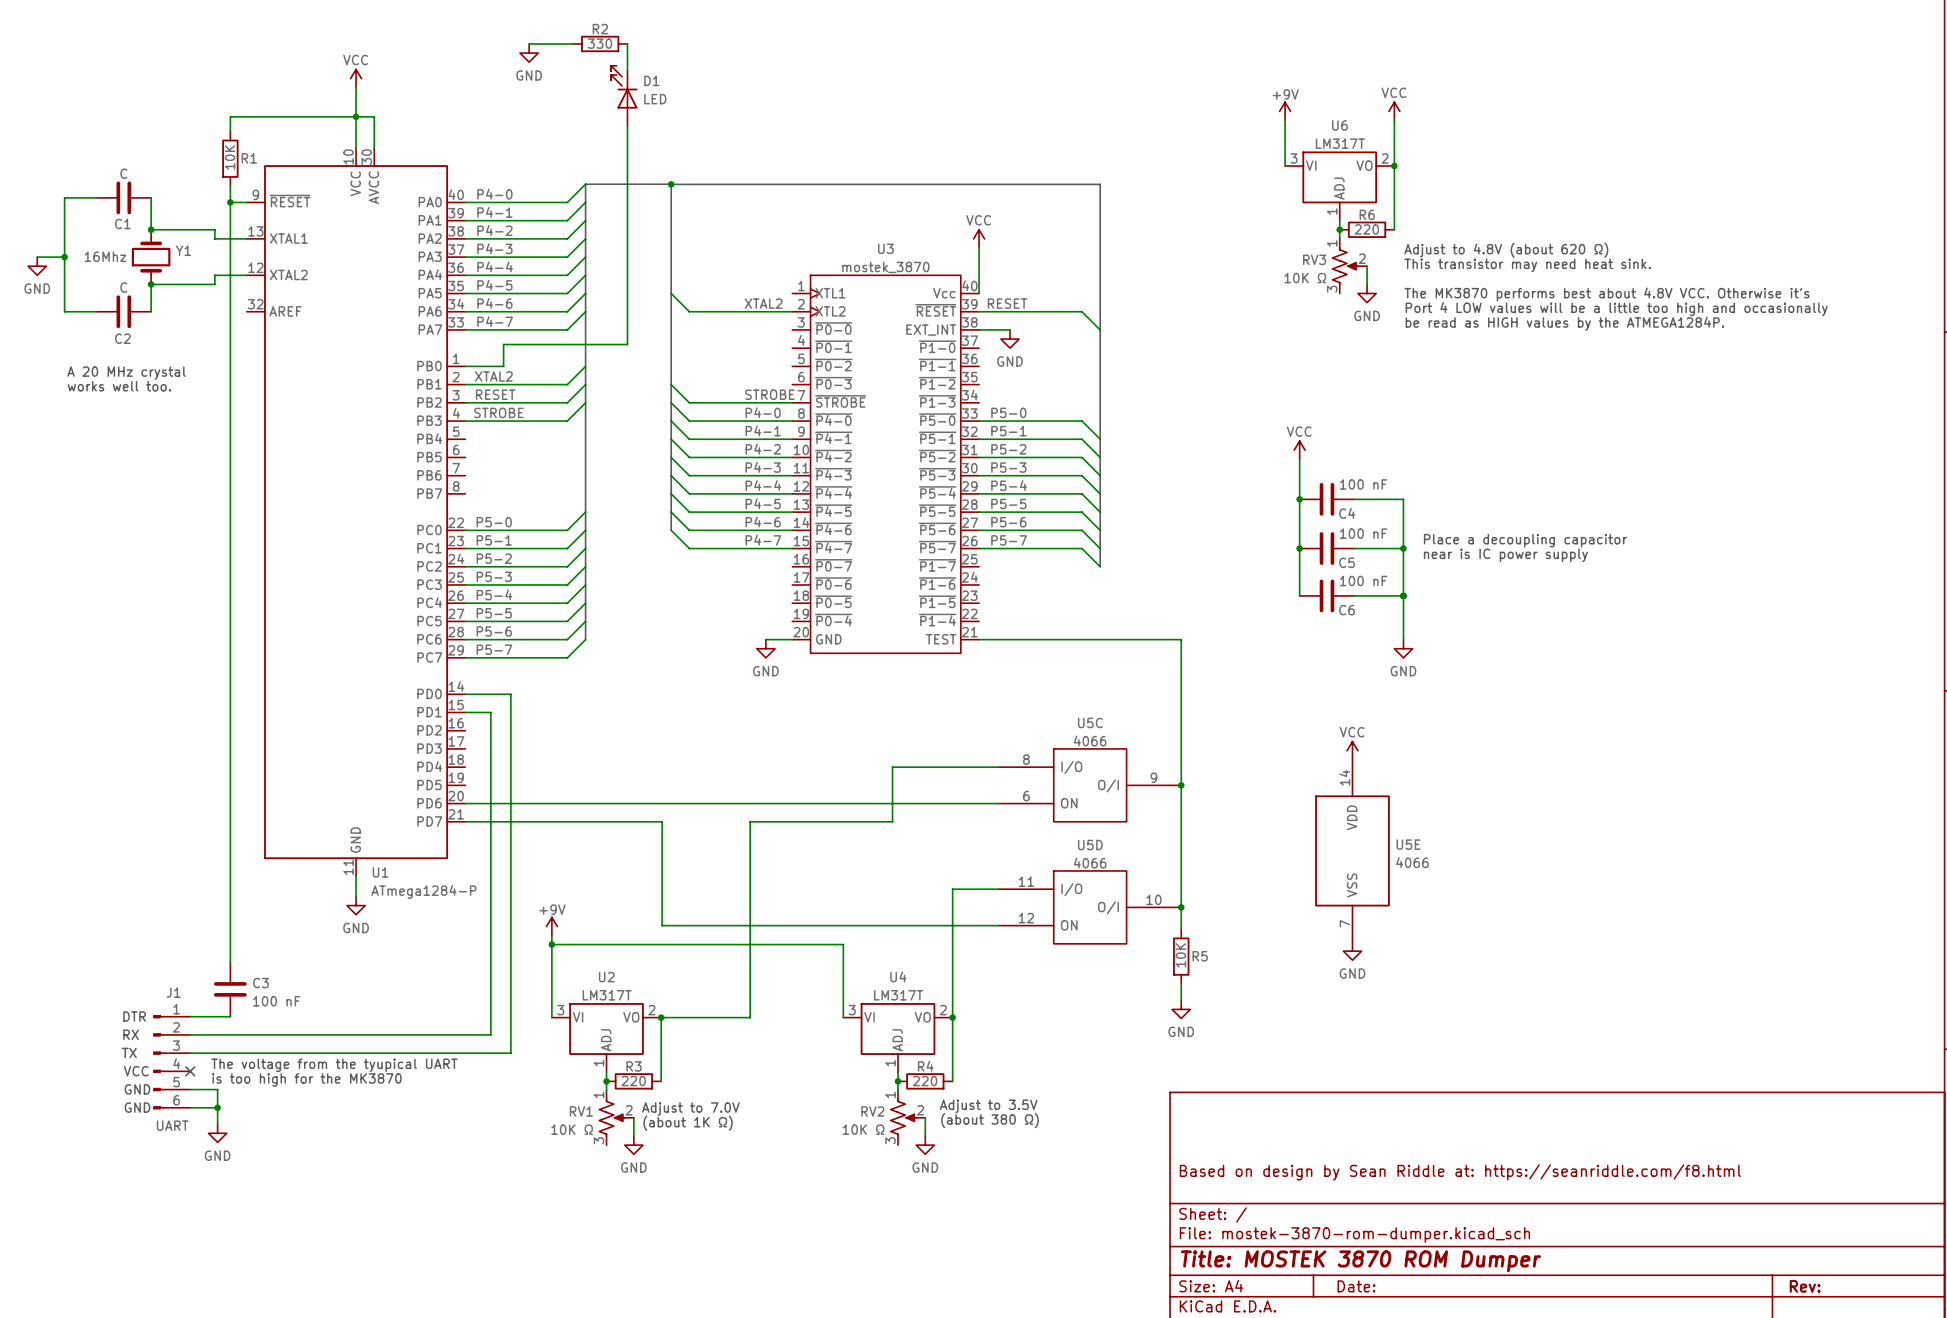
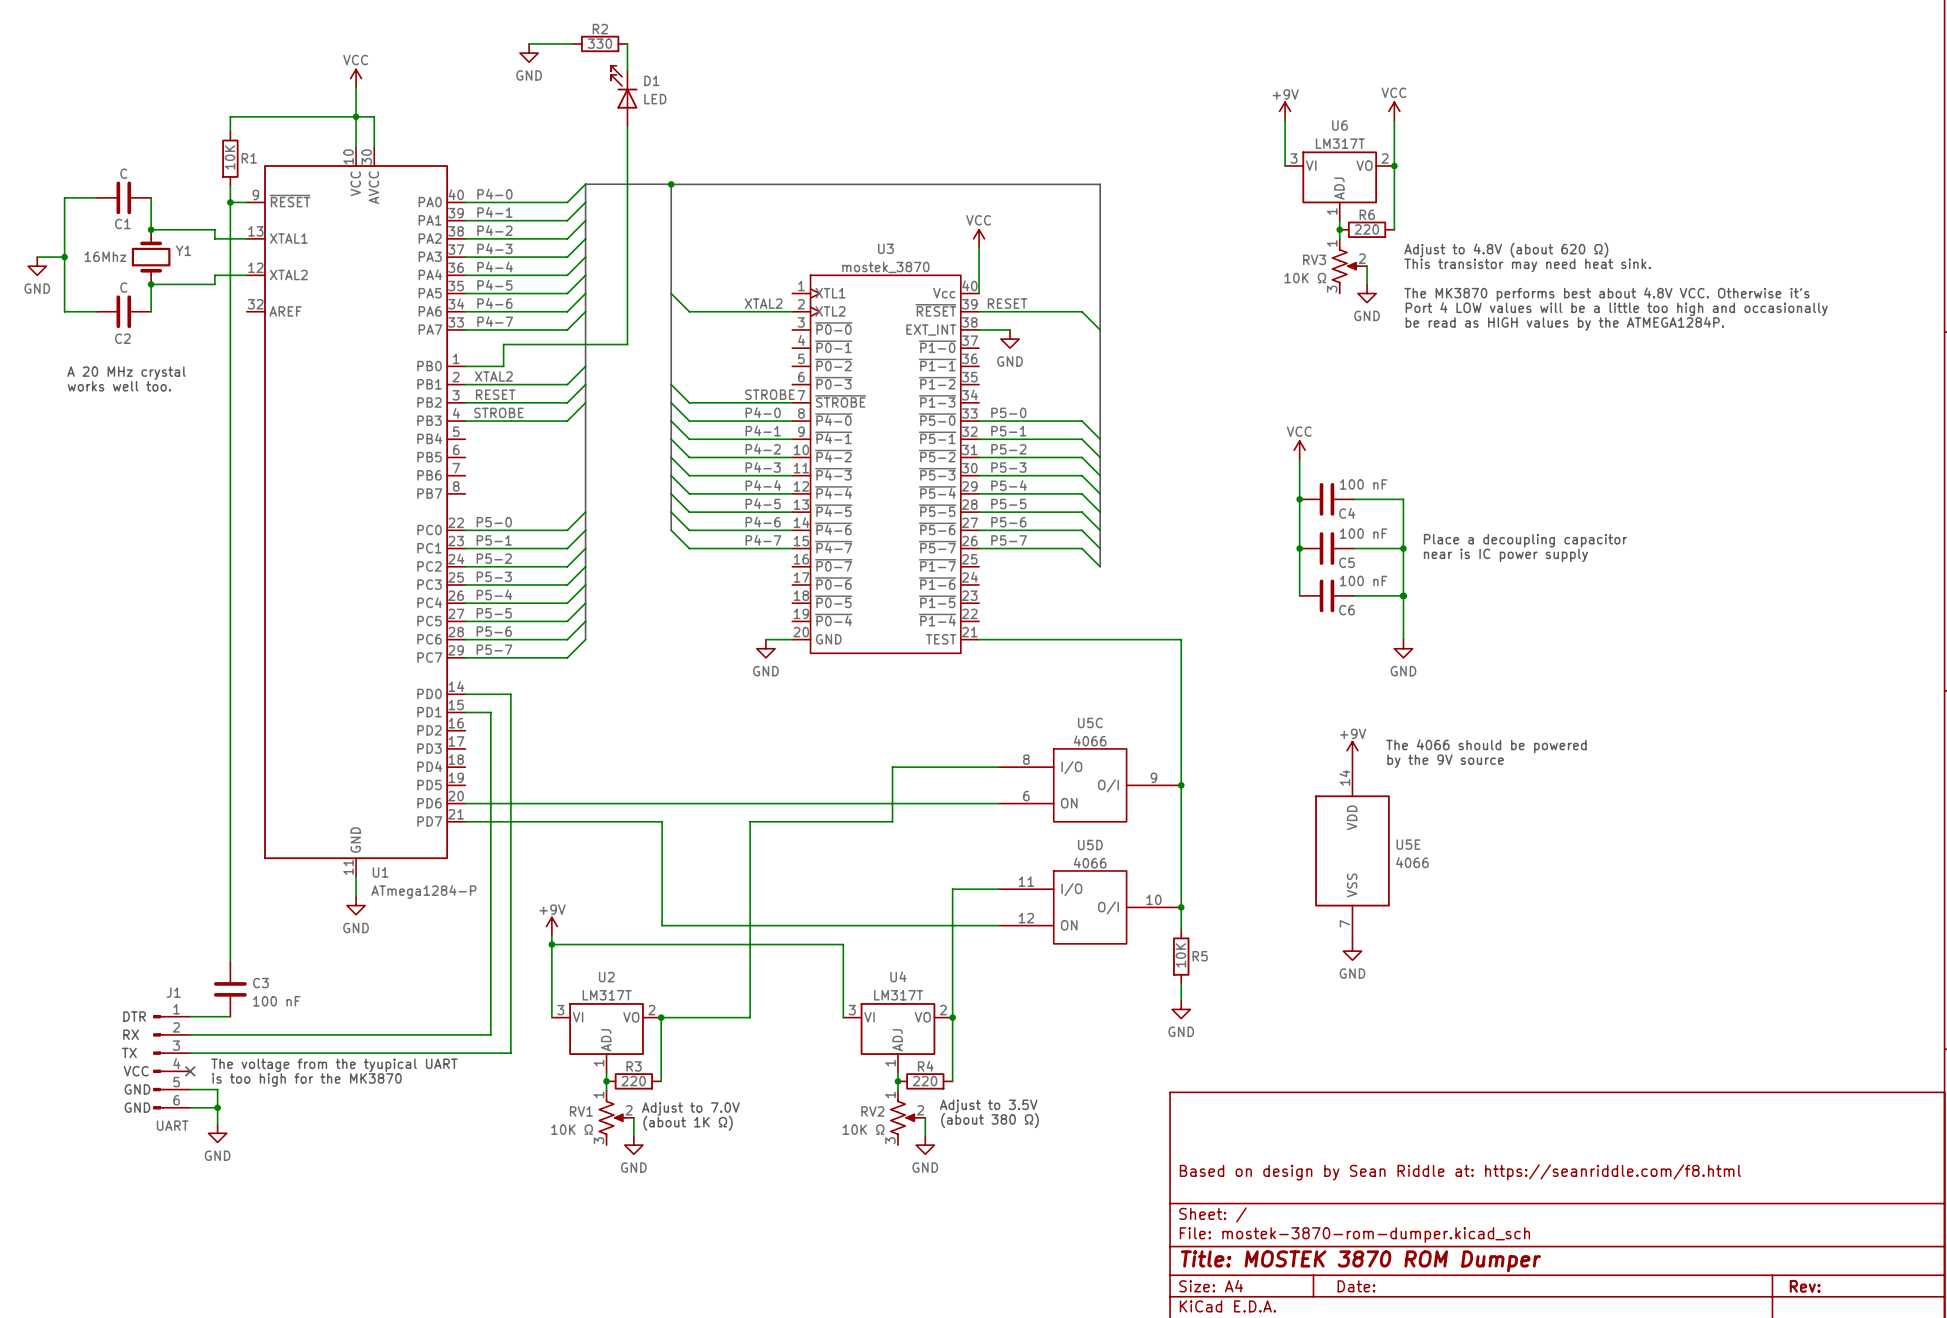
text: none -> The 4066 should be powered (1486, 746)
power symbol: VCC (1352, 750) -> +9V (1352, 750)
text: none -> by the 9V source (1445, 761)

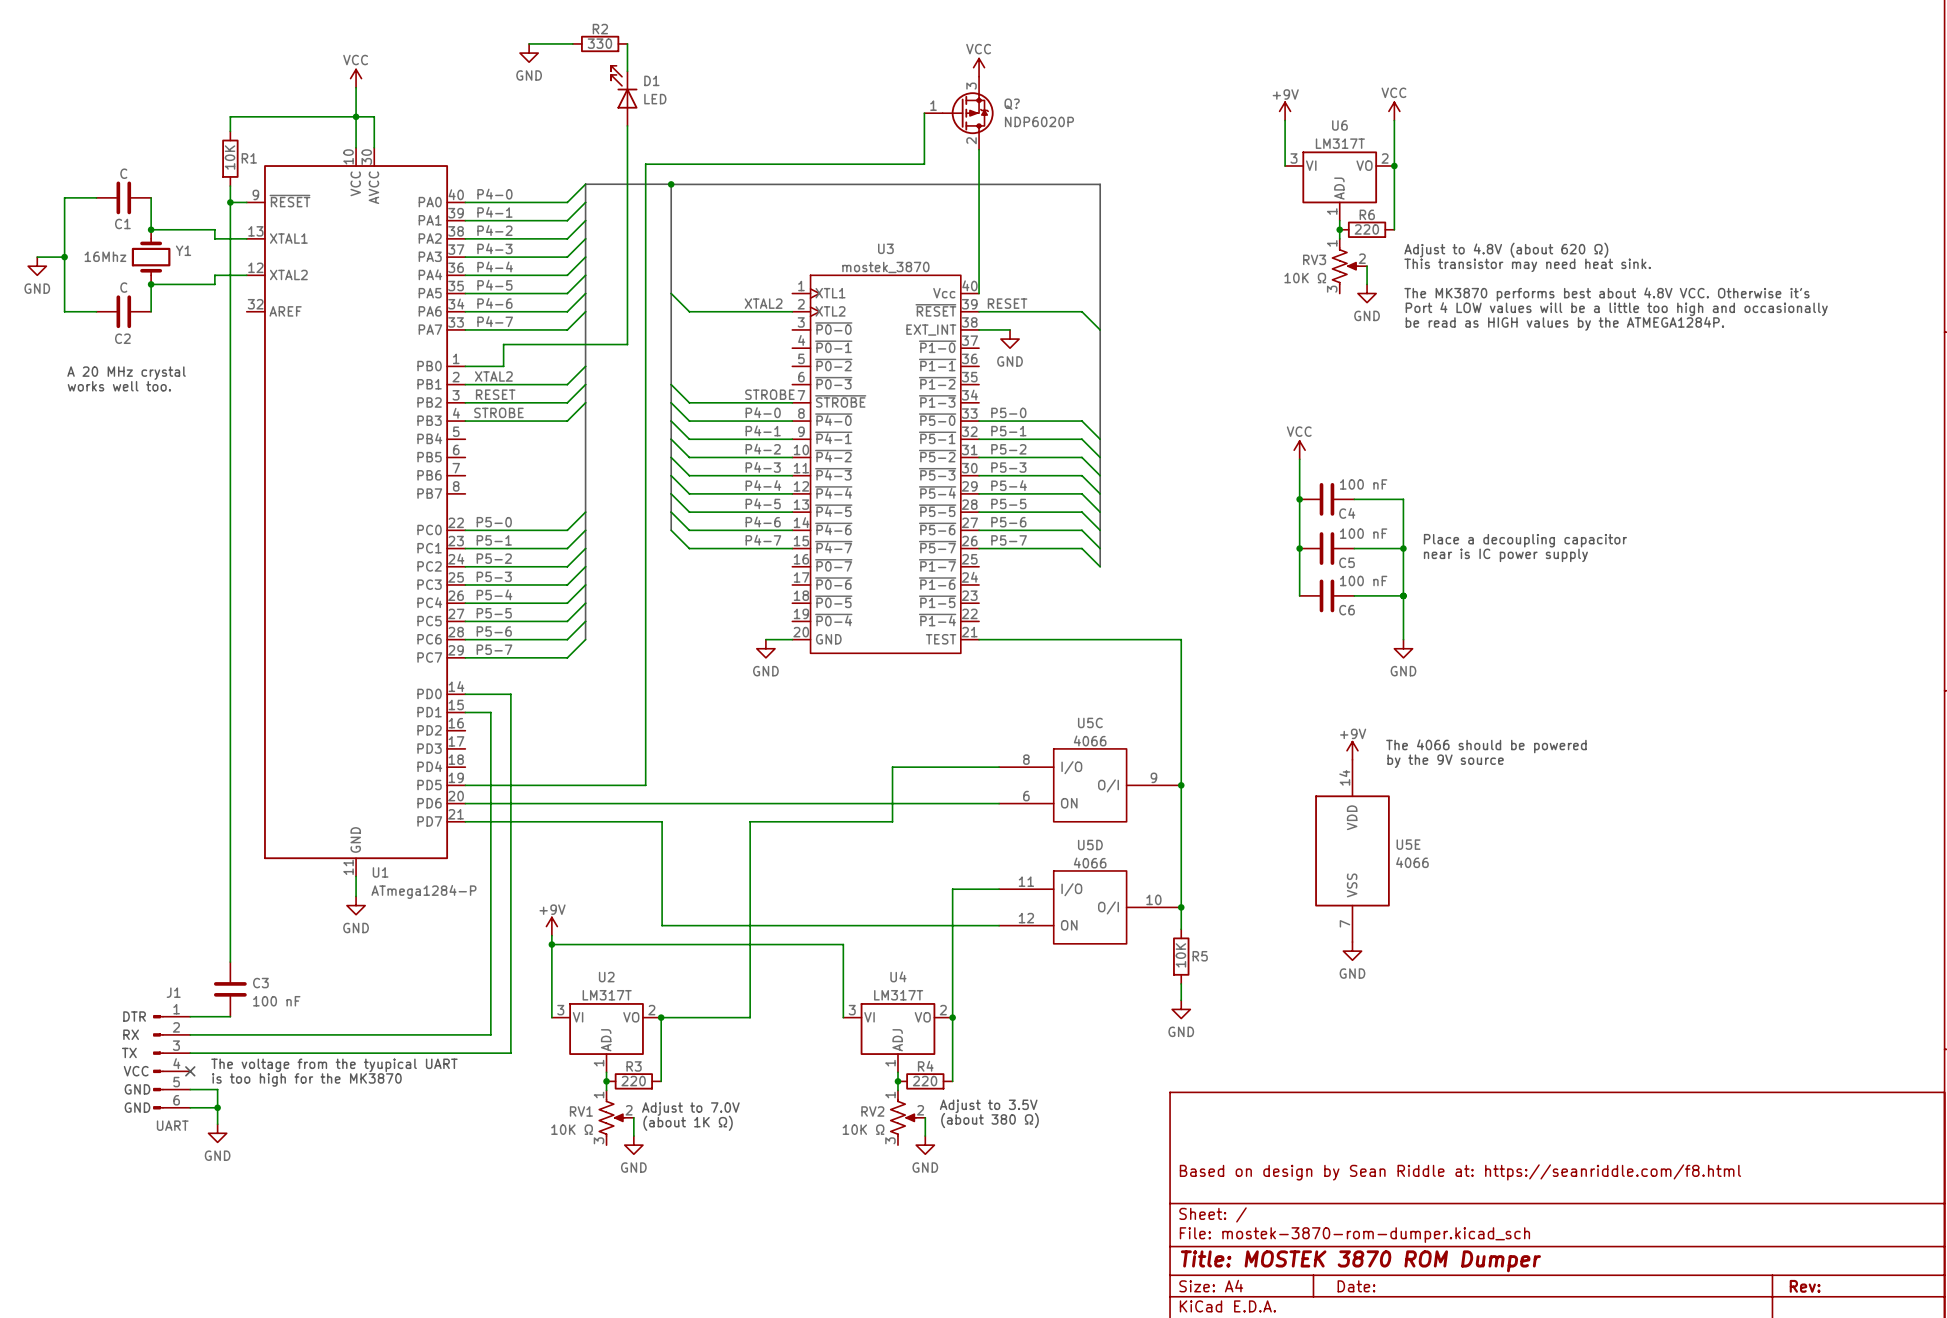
wire: none -> (924, 113) (924, 164) (645, 164) (645, 785) (465, 785)
Q?: none -> NDP6020P (959, 113)
wire: none -> (979, 149) (979, 247)
power symbol position: VCC (979, 238) -> VCC (979, 67)

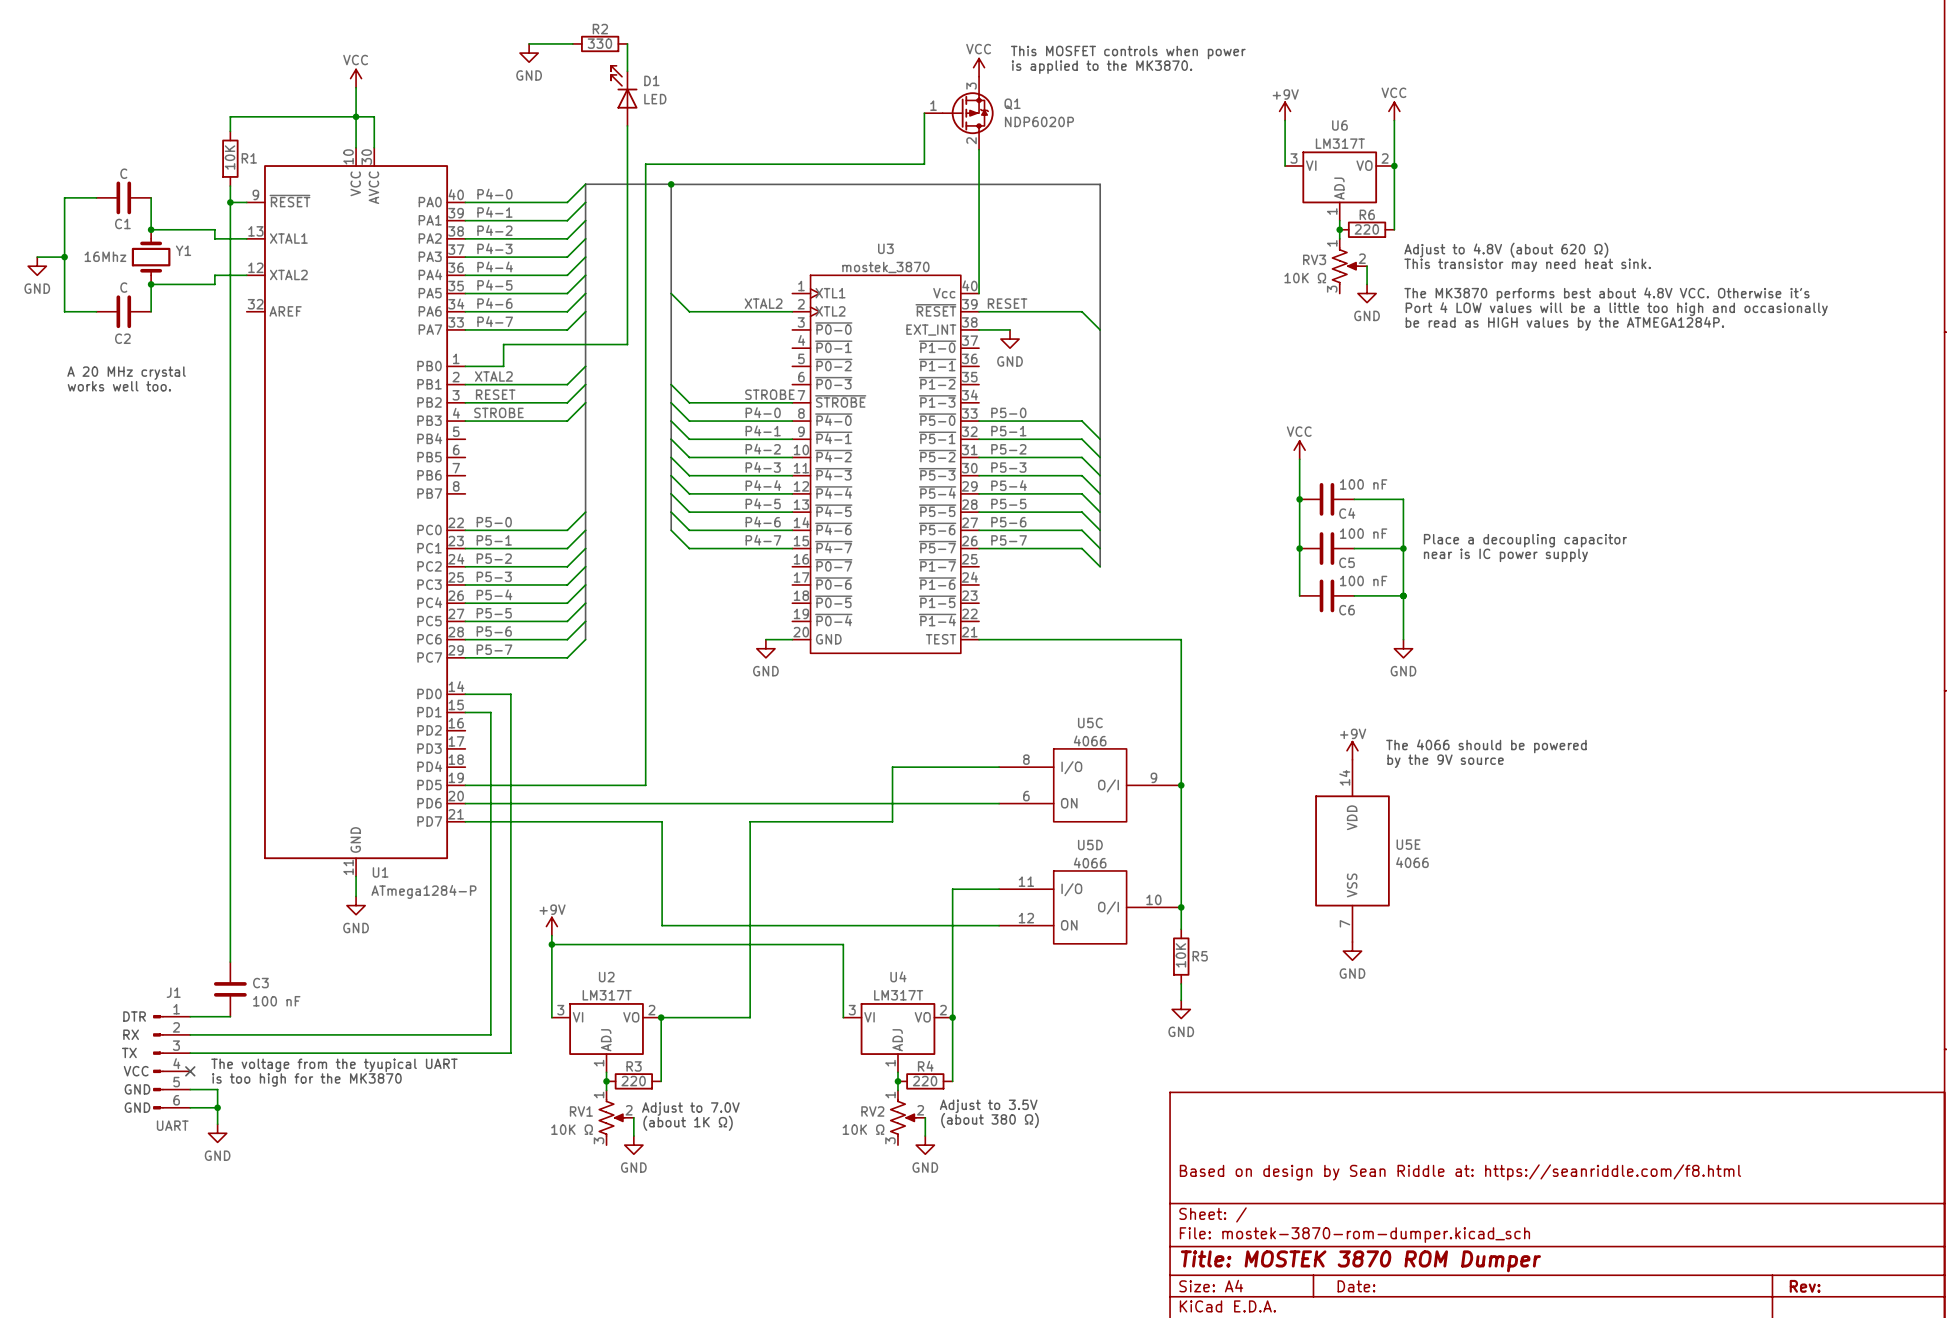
text: none -> This MOSFET controls when power (1128, 52)
text: none -> is applied to the MK3870. (1102, 67)
Q? name: Q? (1012, 104) -> Q1 (1012, 104)

